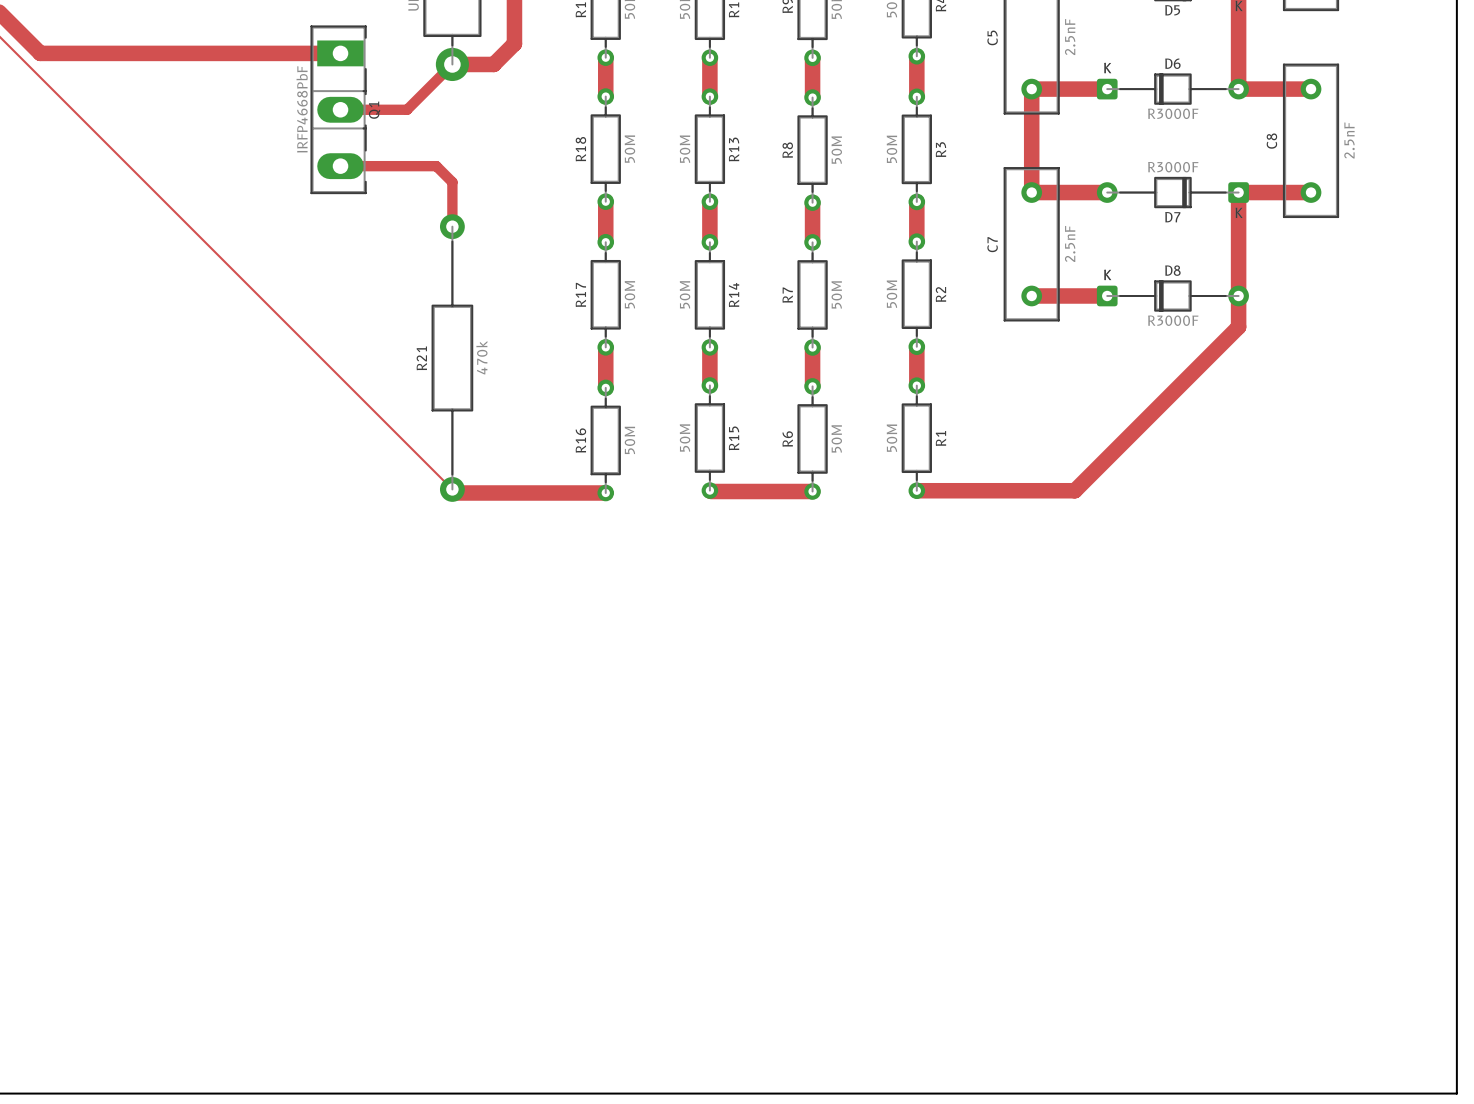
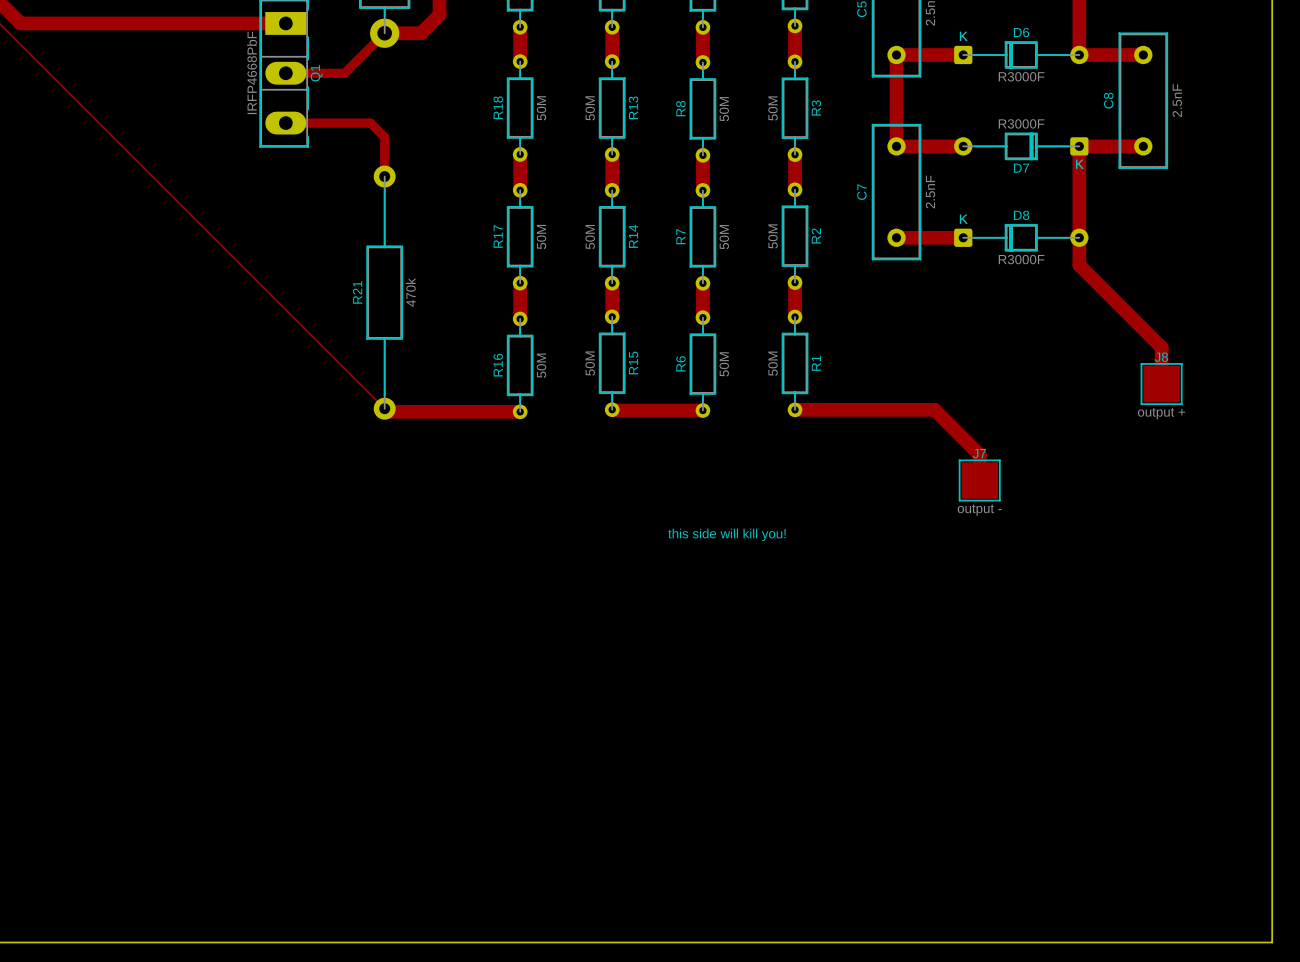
track: (1238, 327) (1074, 490) -> (1079, 265) (1161, 347) (1161, 384)
J8: none -> output + (1161, 384)
track: none -> (934, 409) (979, 454) (979, 480)
J7: none -> output - (979, 480)
text: none -> this side will kill you! (726, 534)

